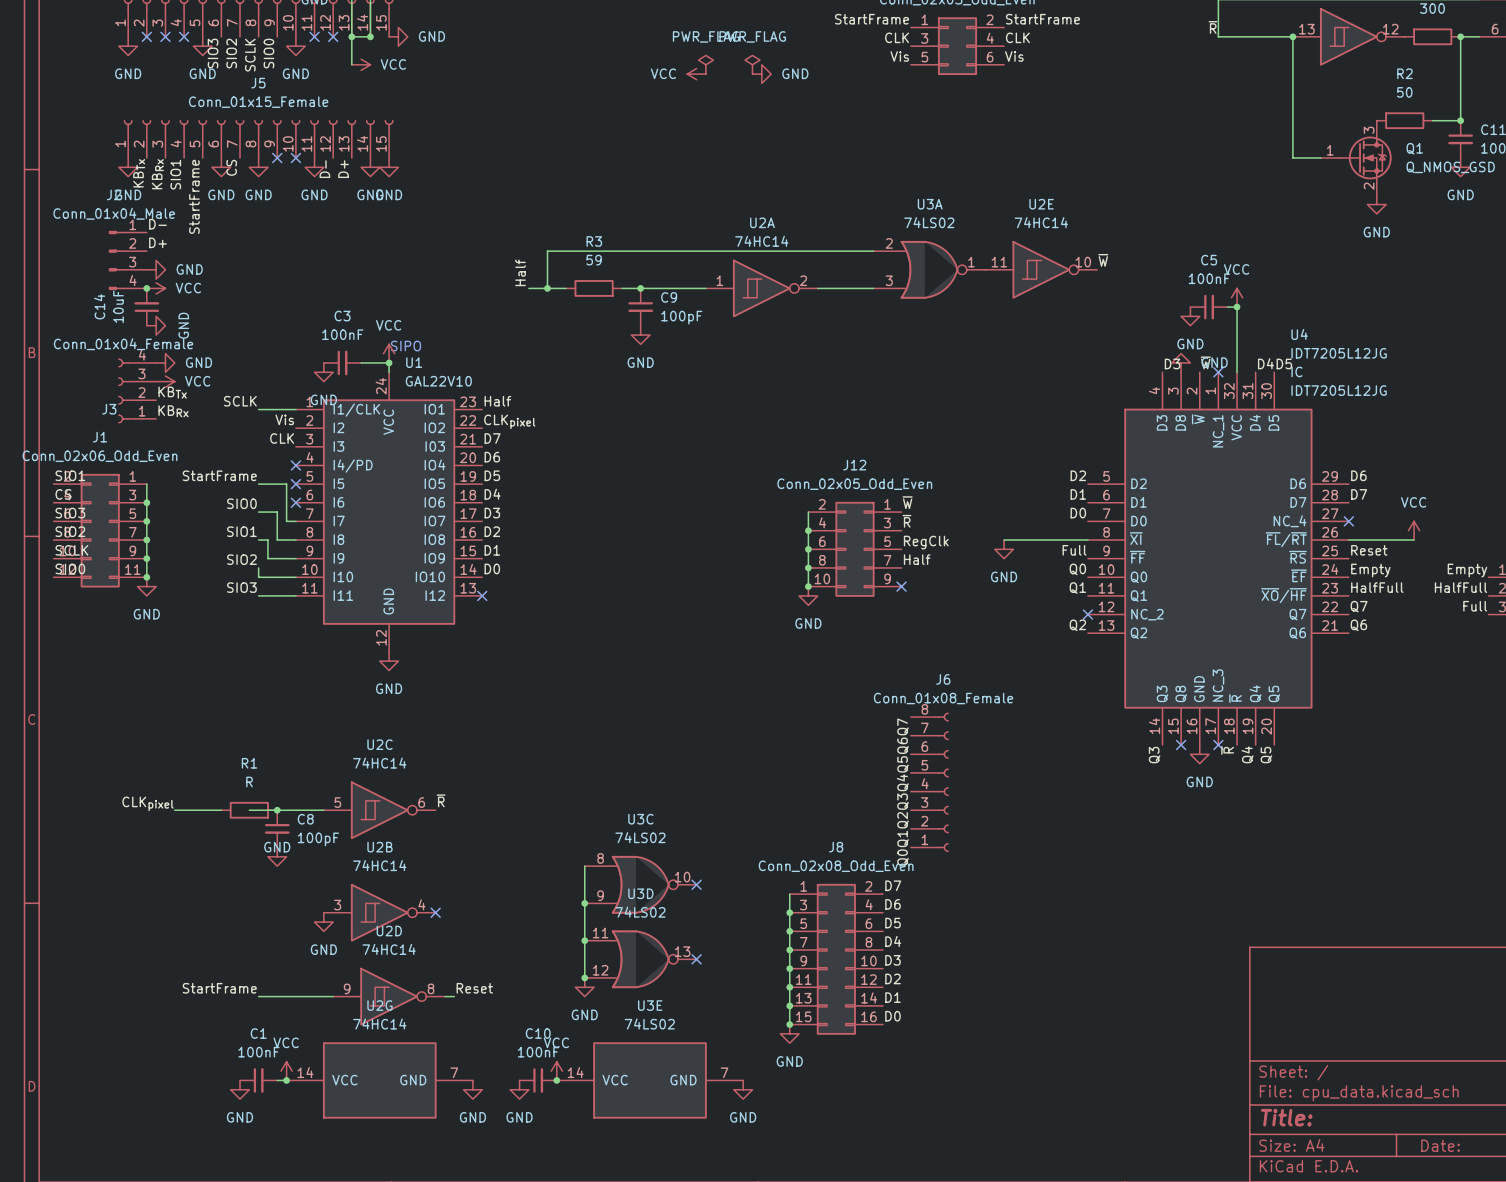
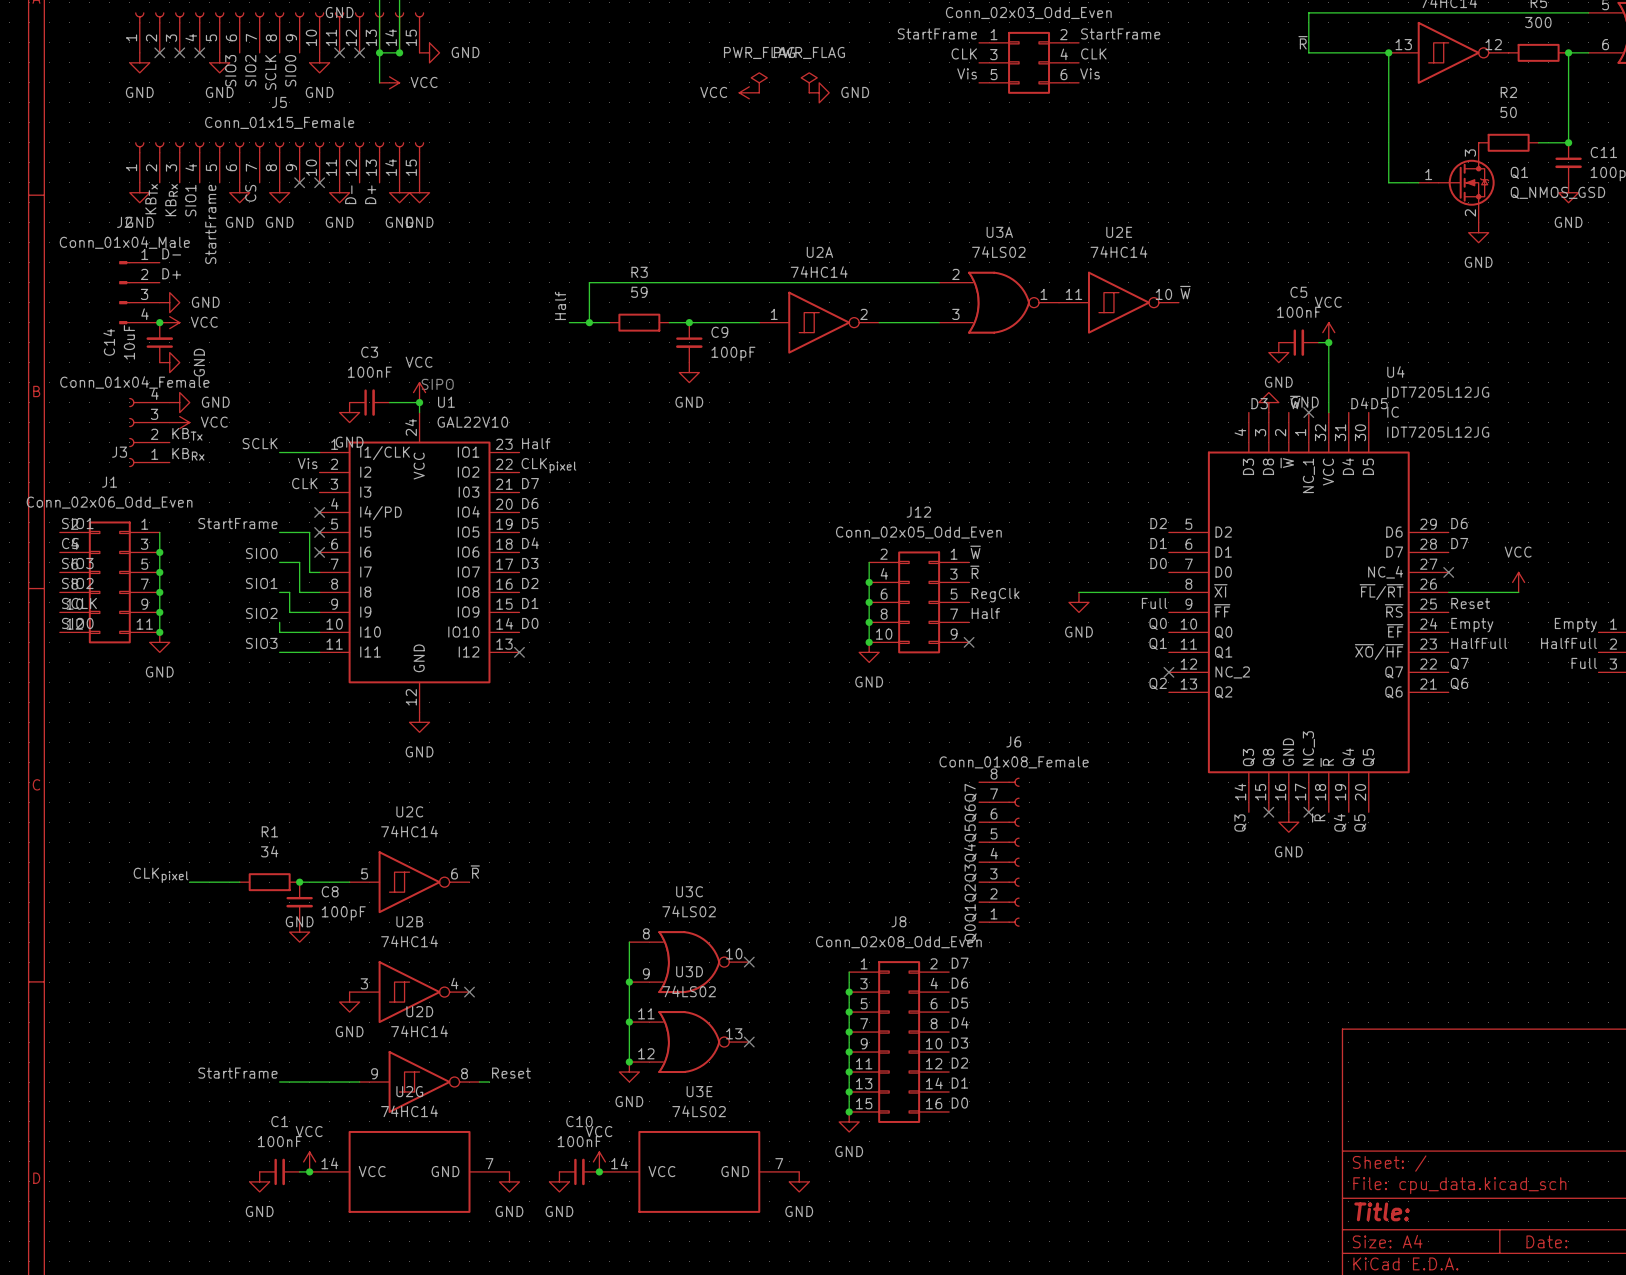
R1 value: R (249, 781) -> 34 (269, 851)
wire: (249, 810) (277, 810) -> none

